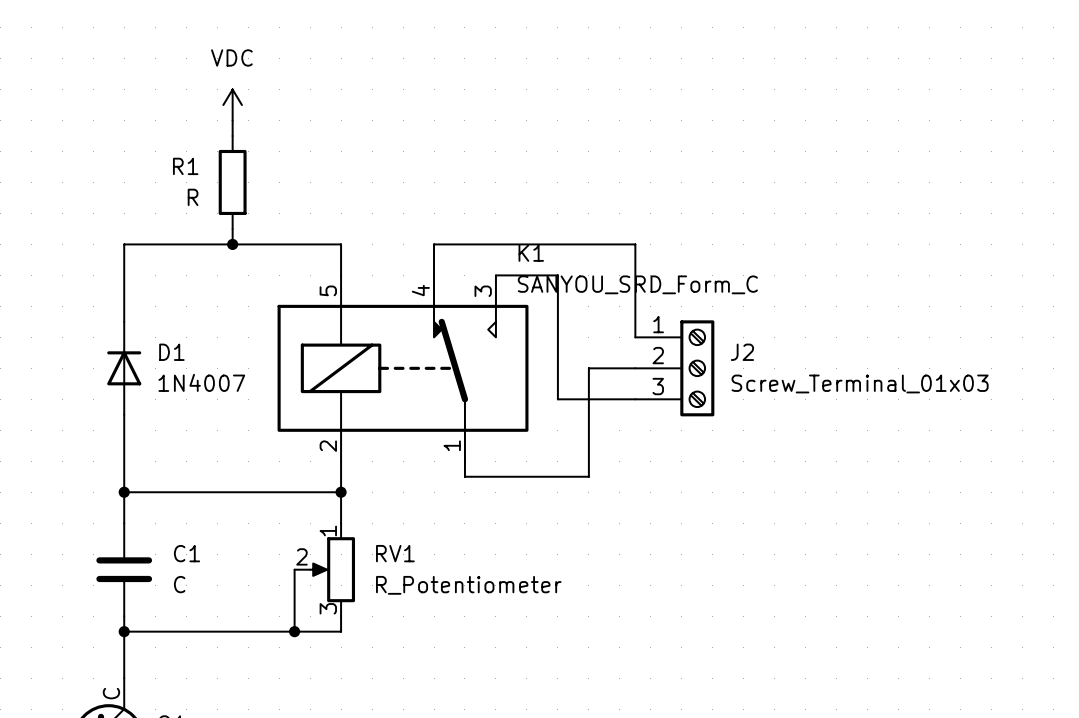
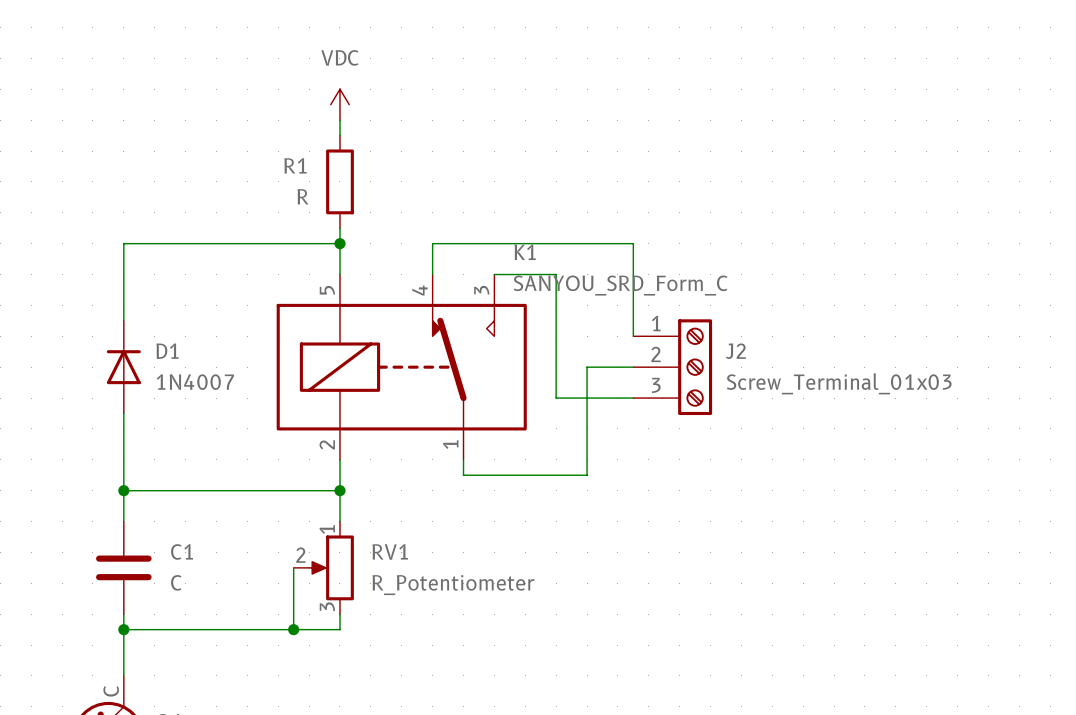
power symbol position: VDC (232, 105) -> VDC (339, 104)
wire: (232, 120) (232, 136) -> (339, 120) (339, 135)
R1 position: (232, 182) -> (339, 181)
wire: (232, 228) (232, 244) -> (339, 228) (339, 243)
junction: (232, 244) -> none
junction: none -> (339, 243)

